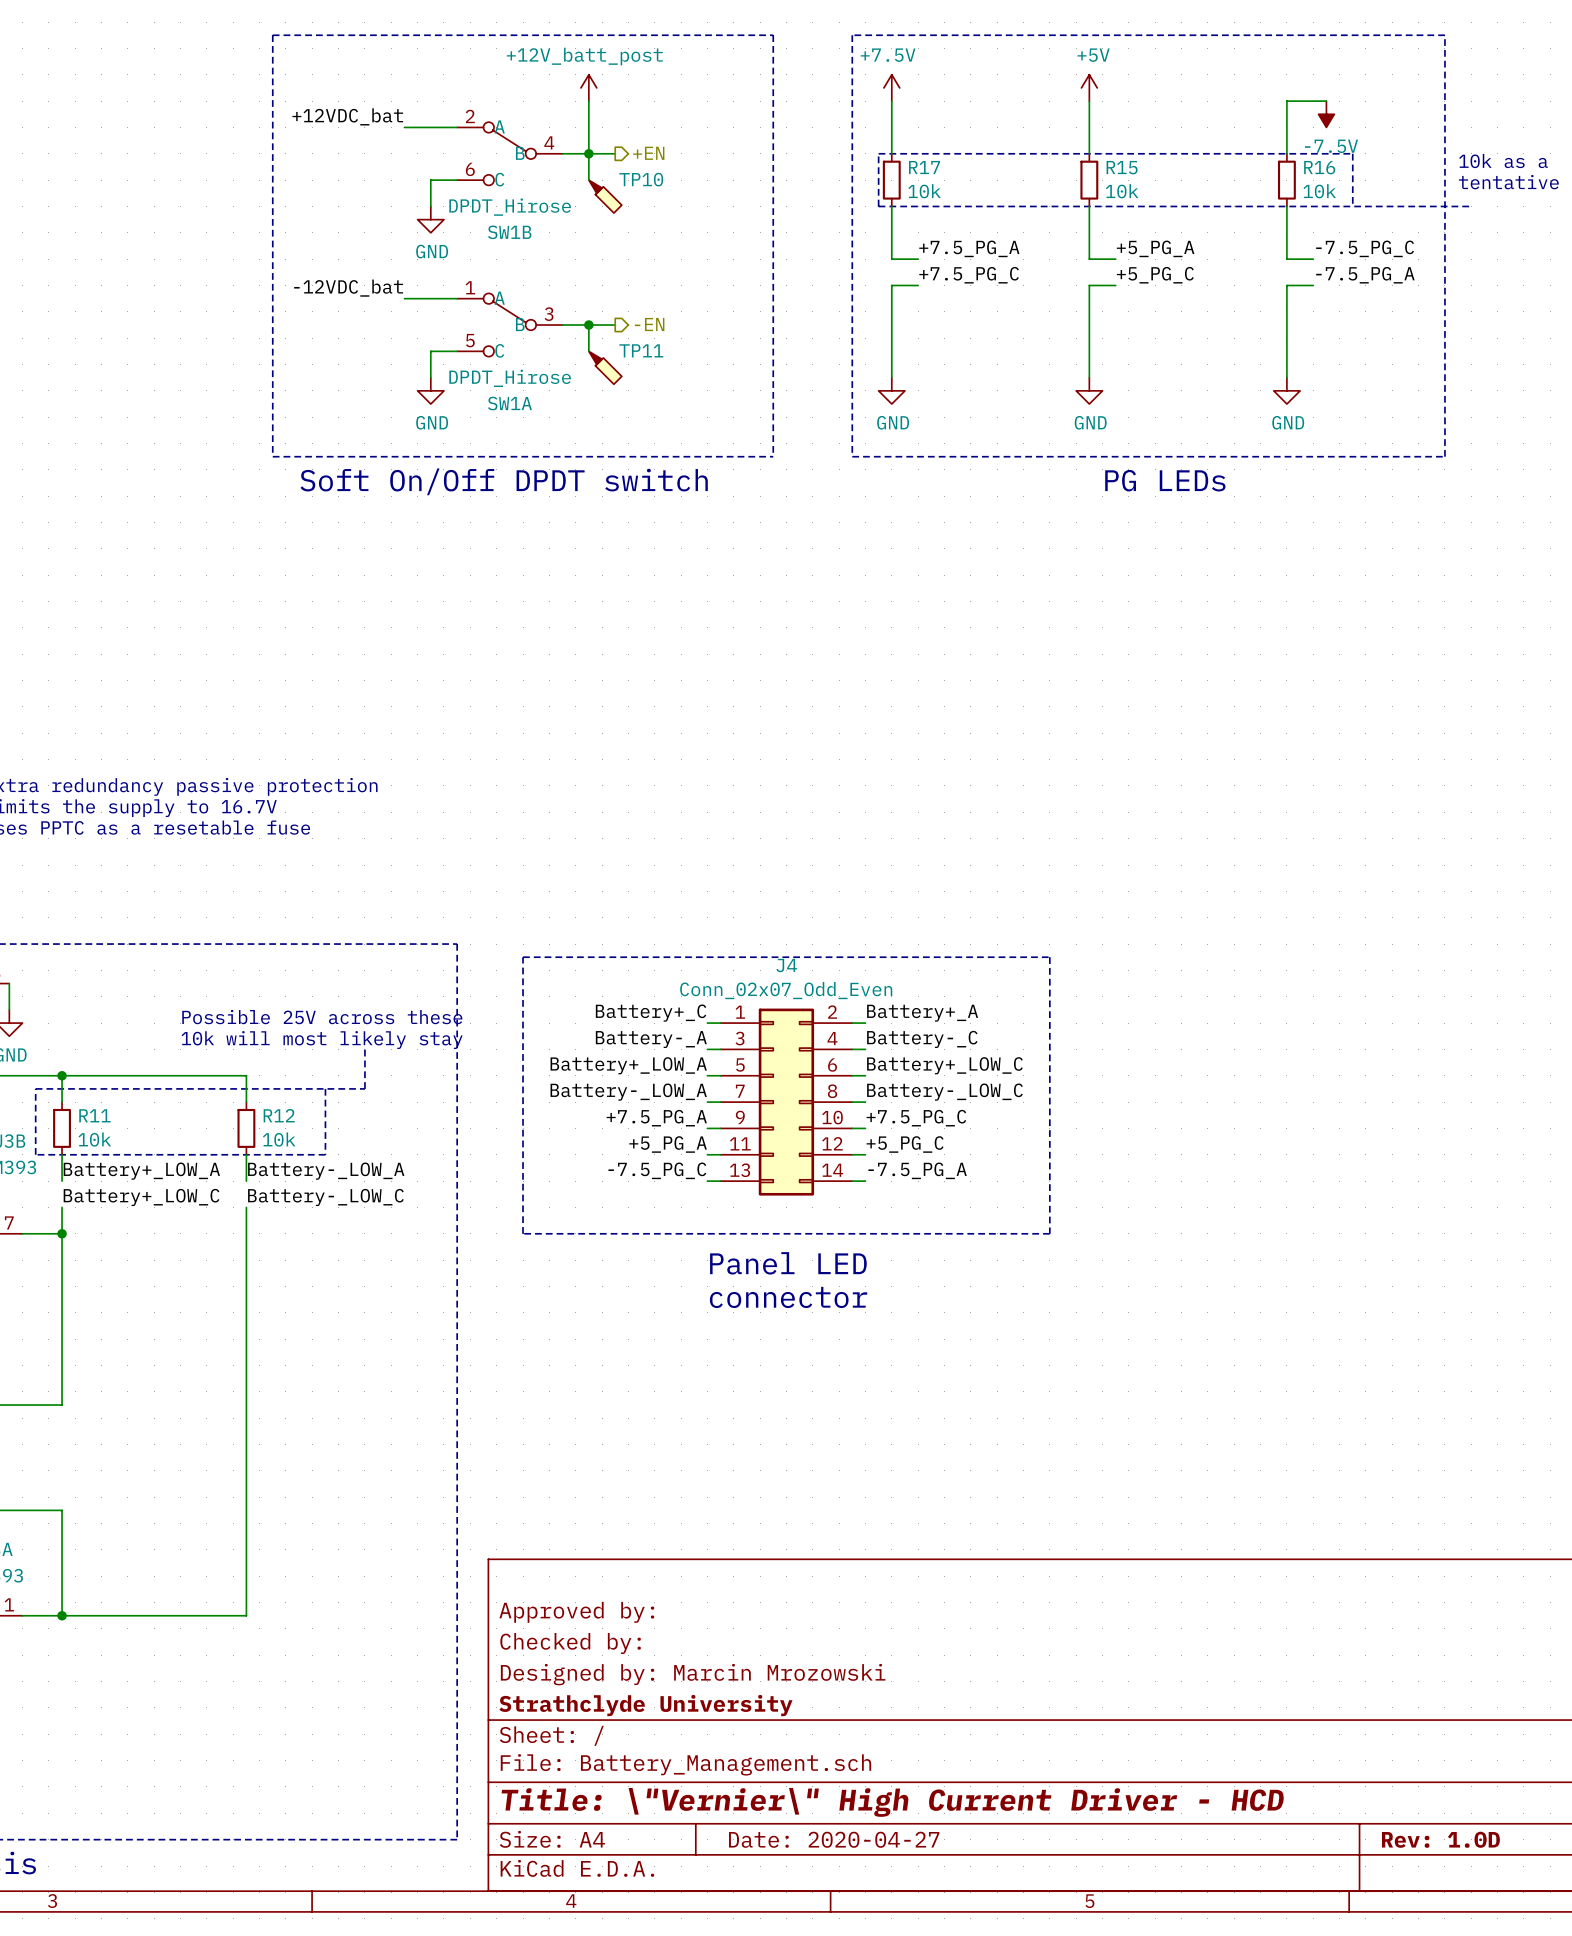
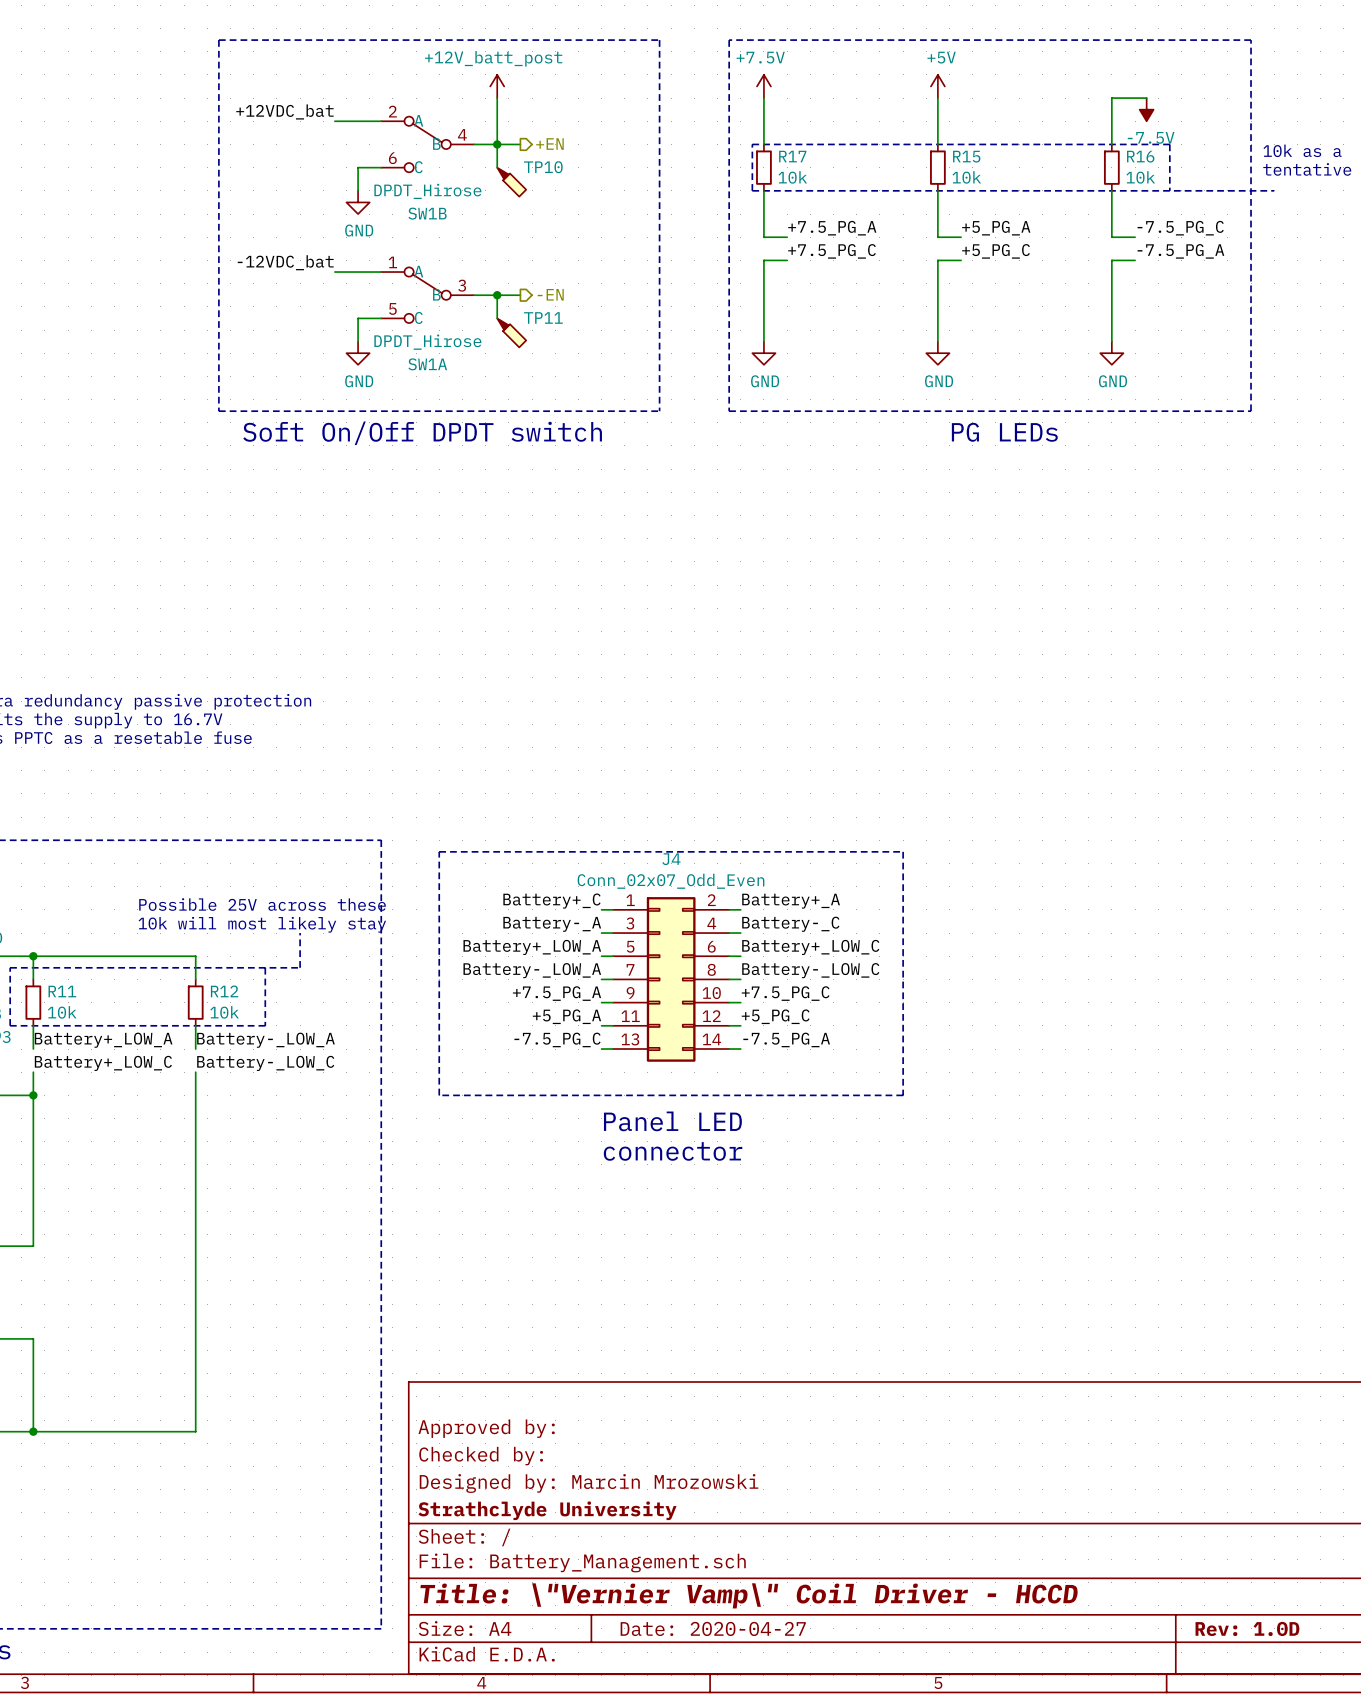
title block: Title: \"Vernier\" High Current Driver - HCD (892, 1802) -> Title: \"Vernier Vamp\" Coil Driver - HCCD (749, 1595)

